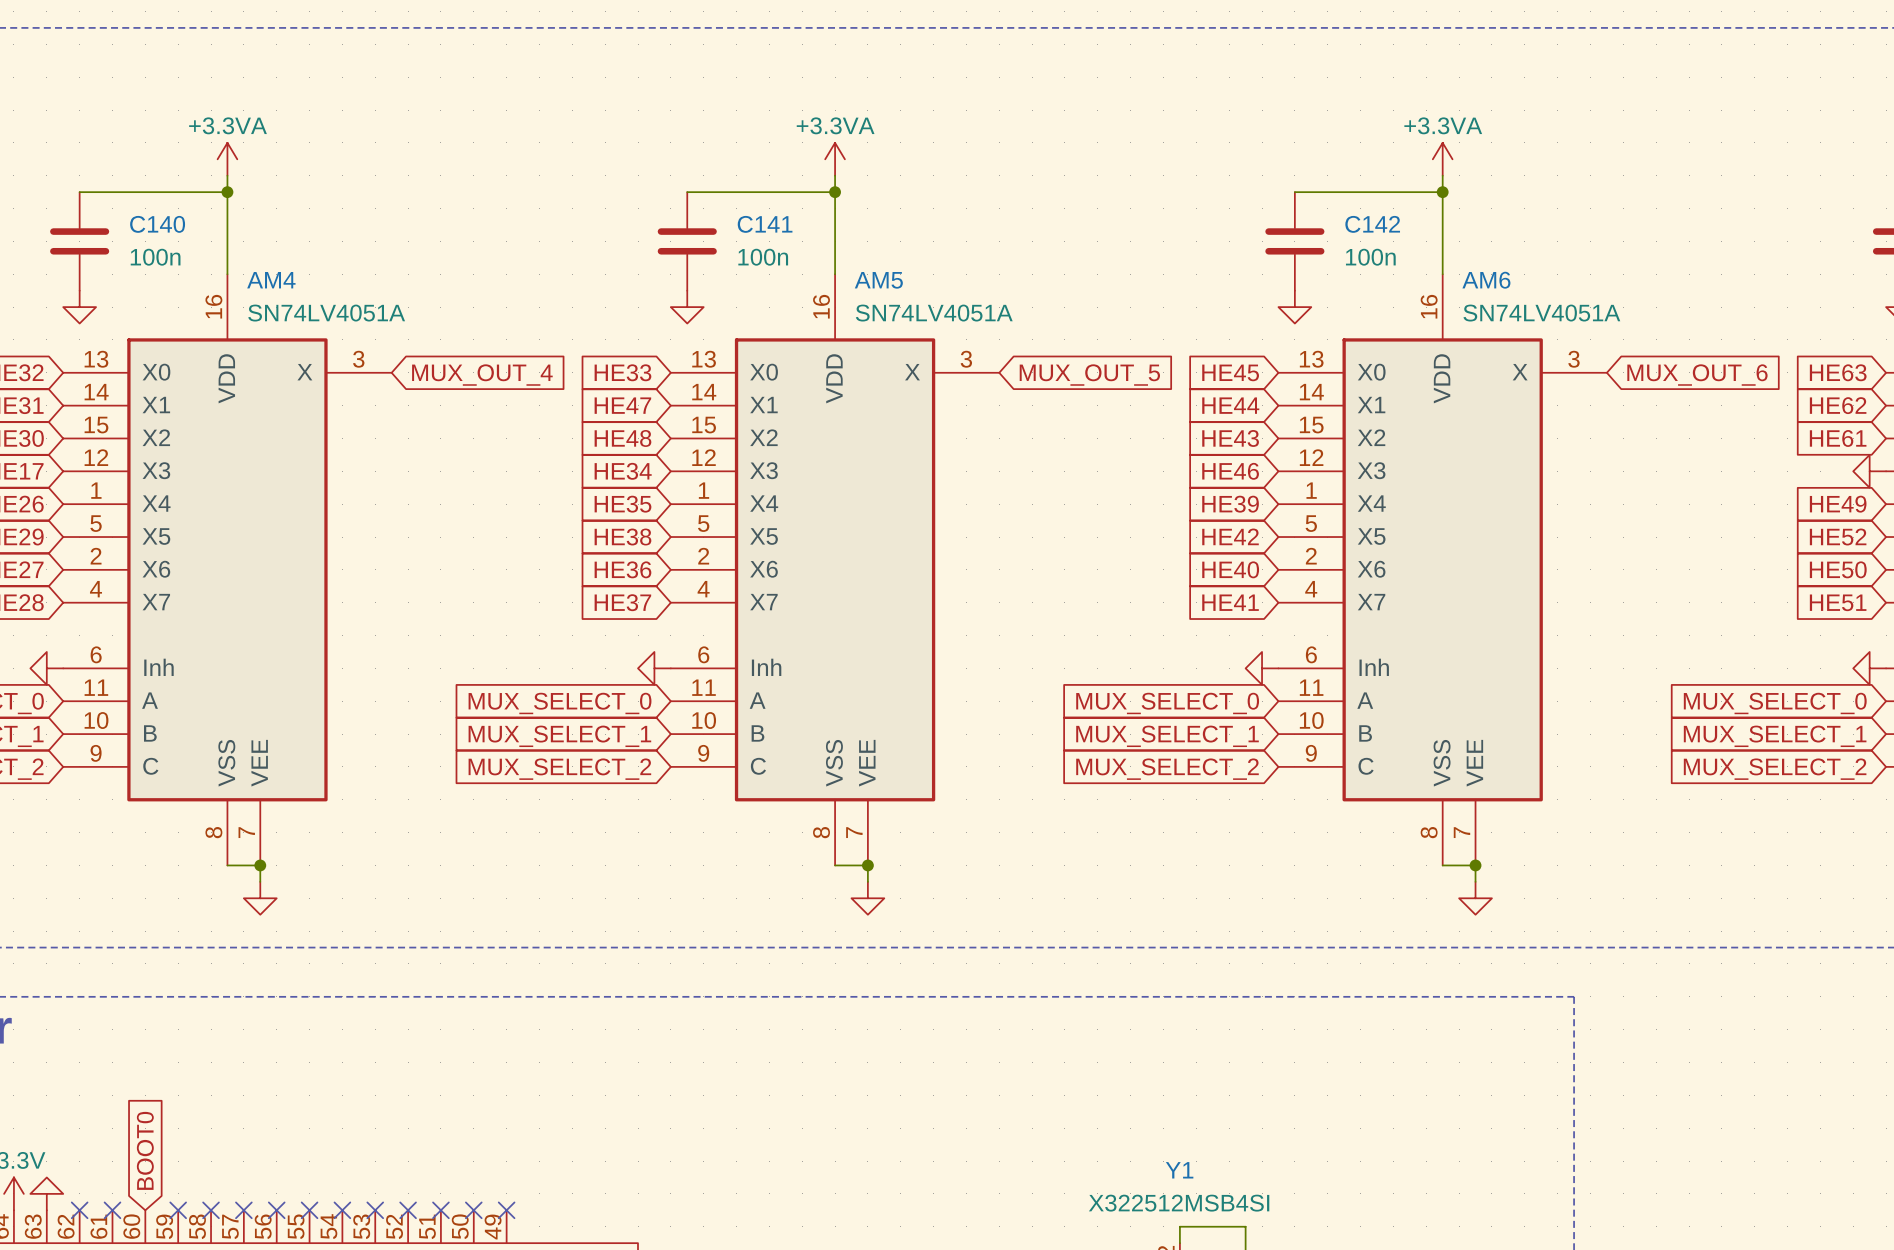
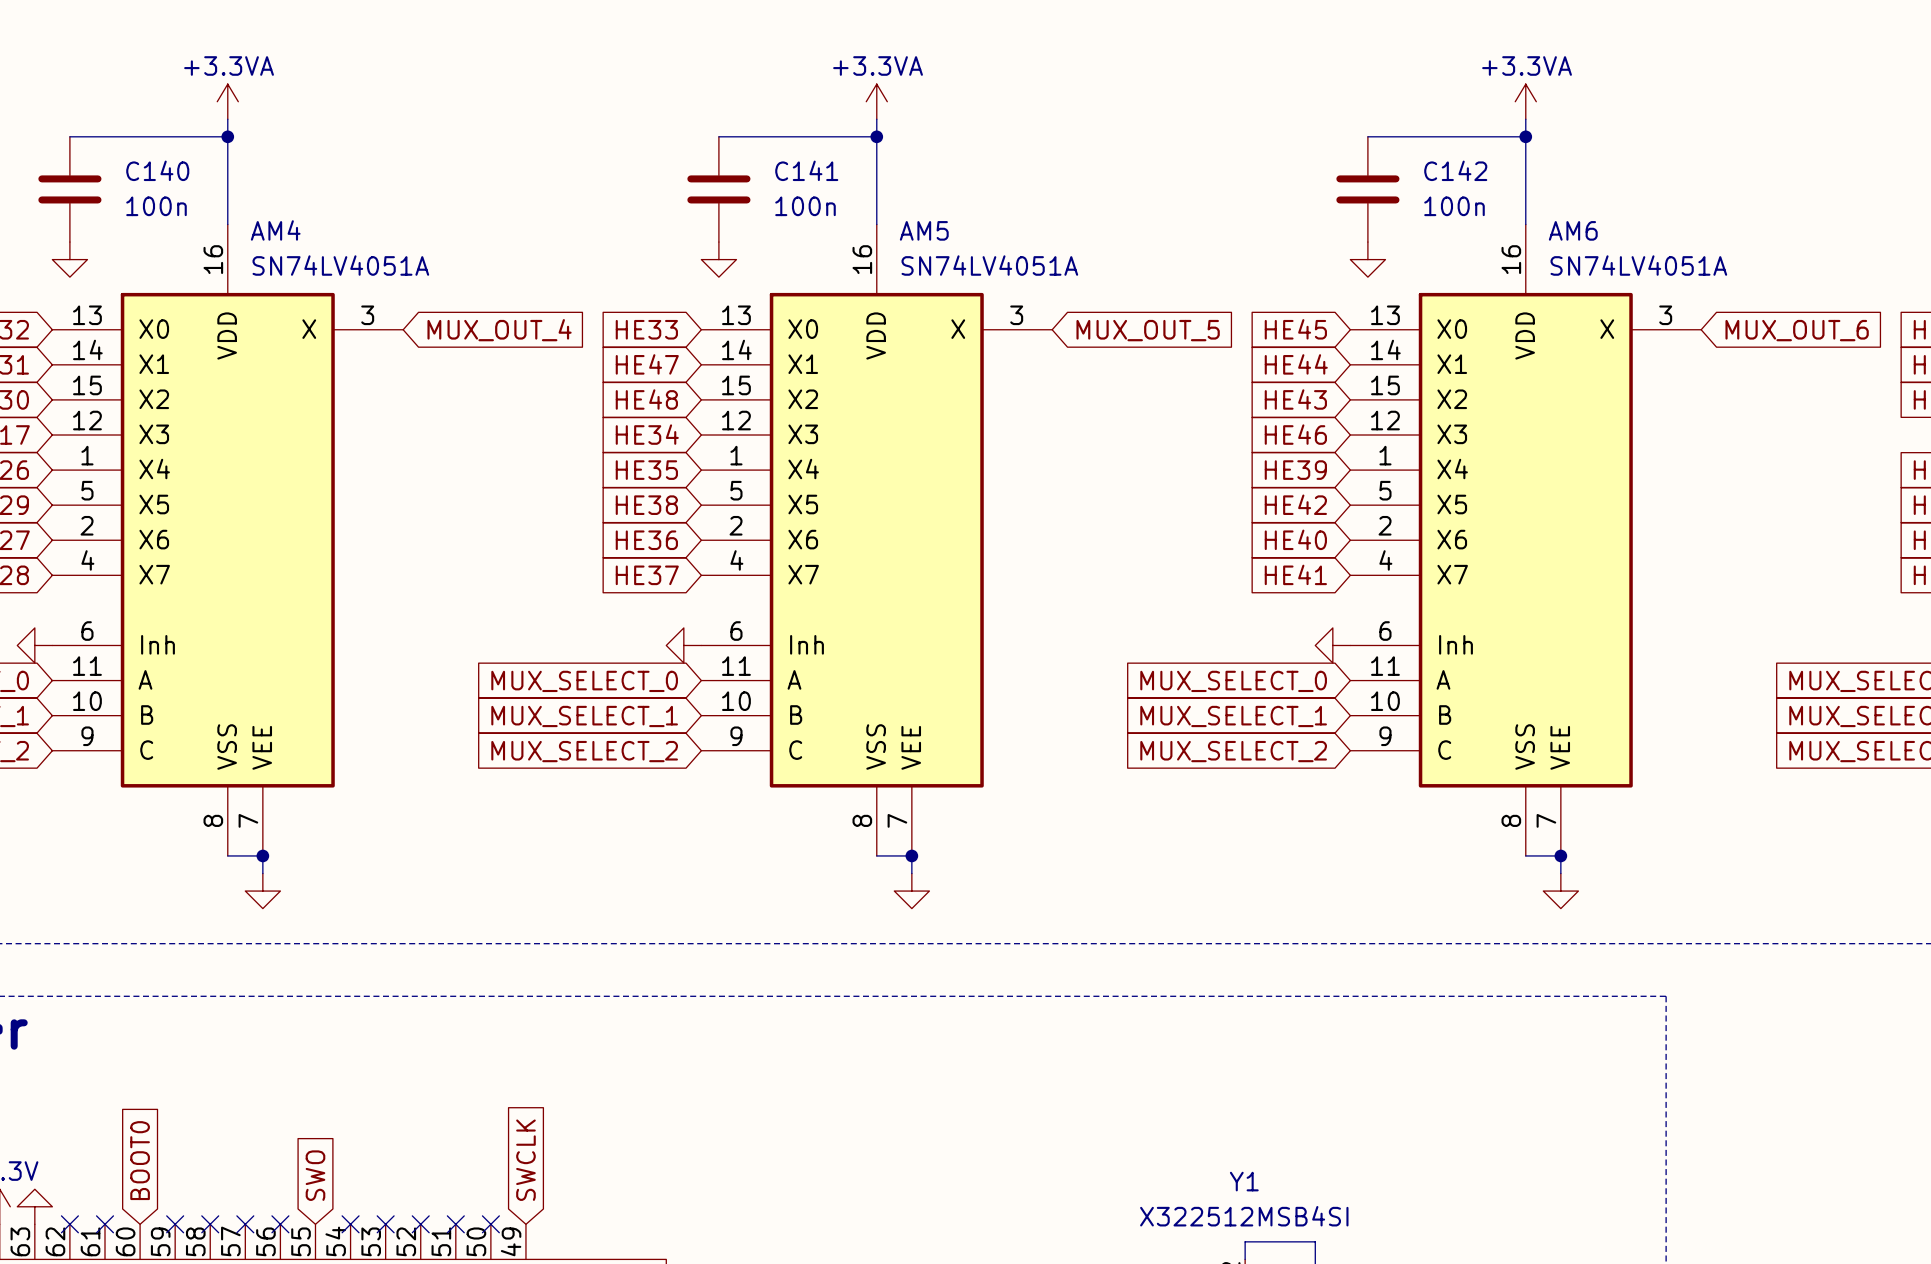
global label: none -> SWCLK (525, 1160)
global label: none -> SWO (315, 1175)
no-connect mark: (309, 1210) -> none
no-connect mark: (506, 1210) -> none

